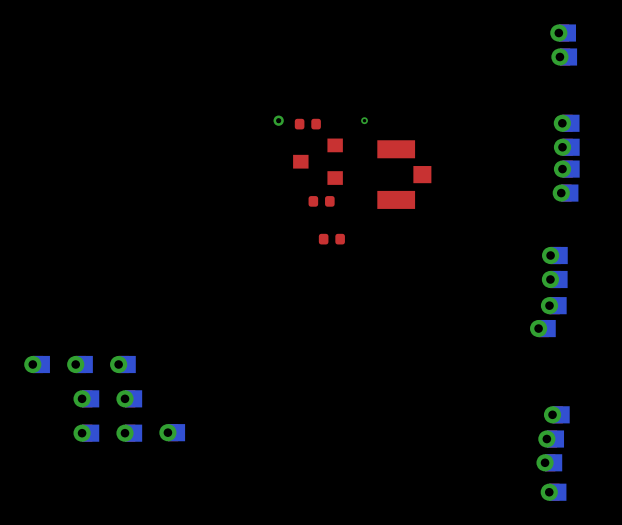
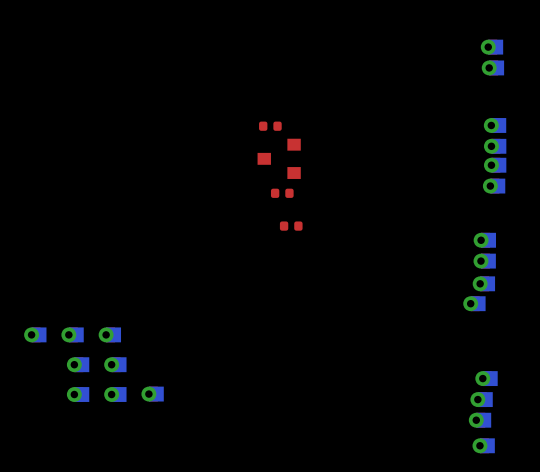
via: (278, 120) -> none
via: (364, 120) -> none
part: (404, 174) -> none

